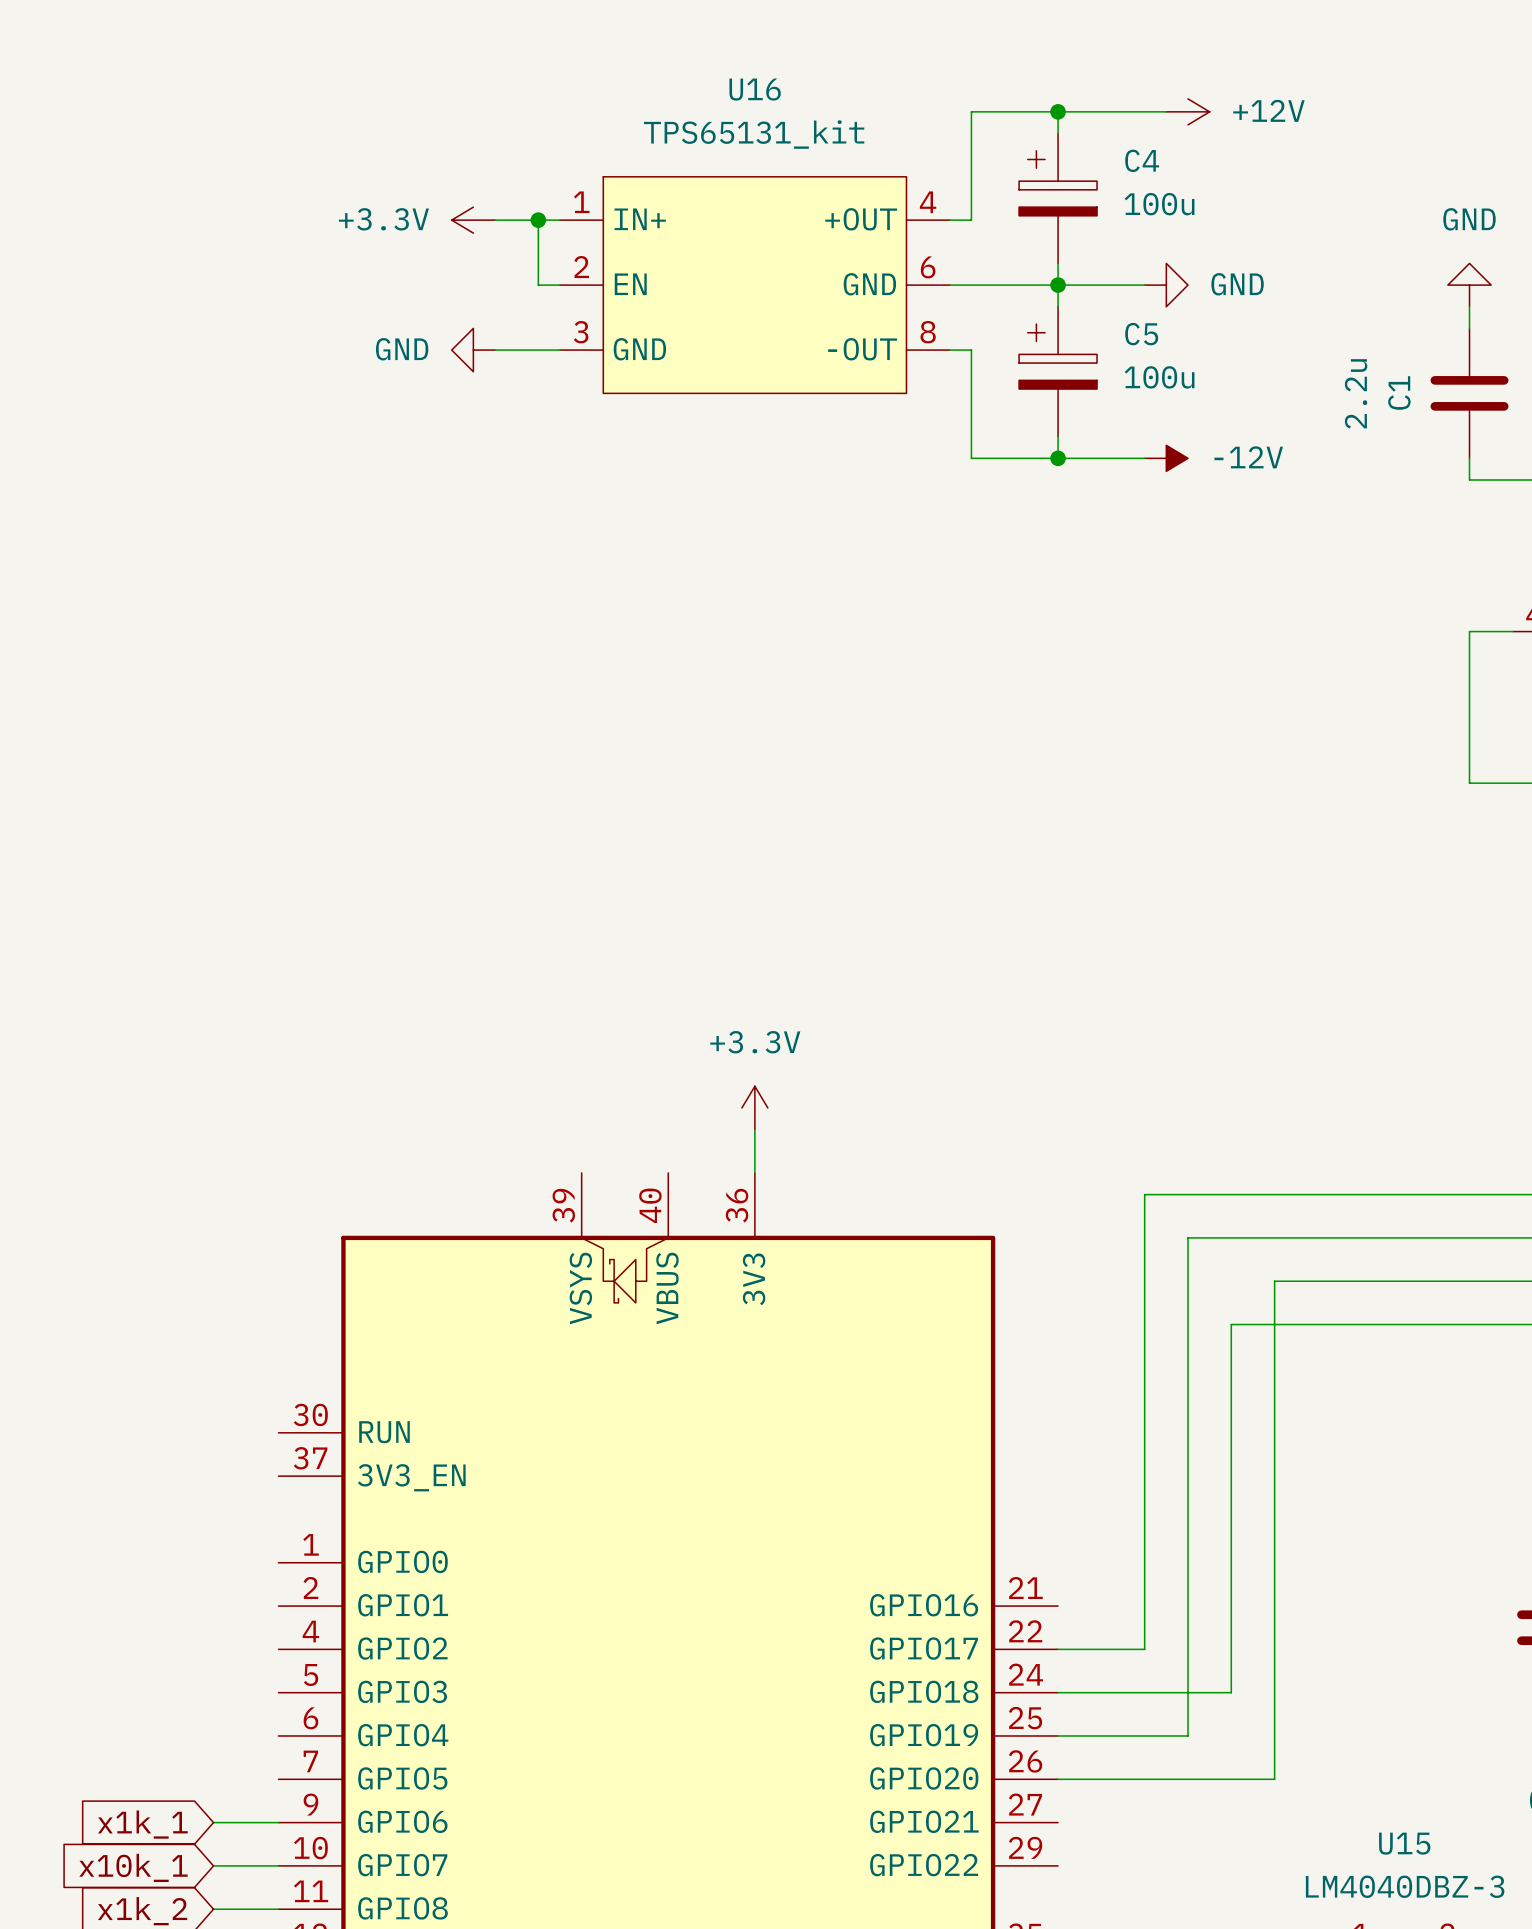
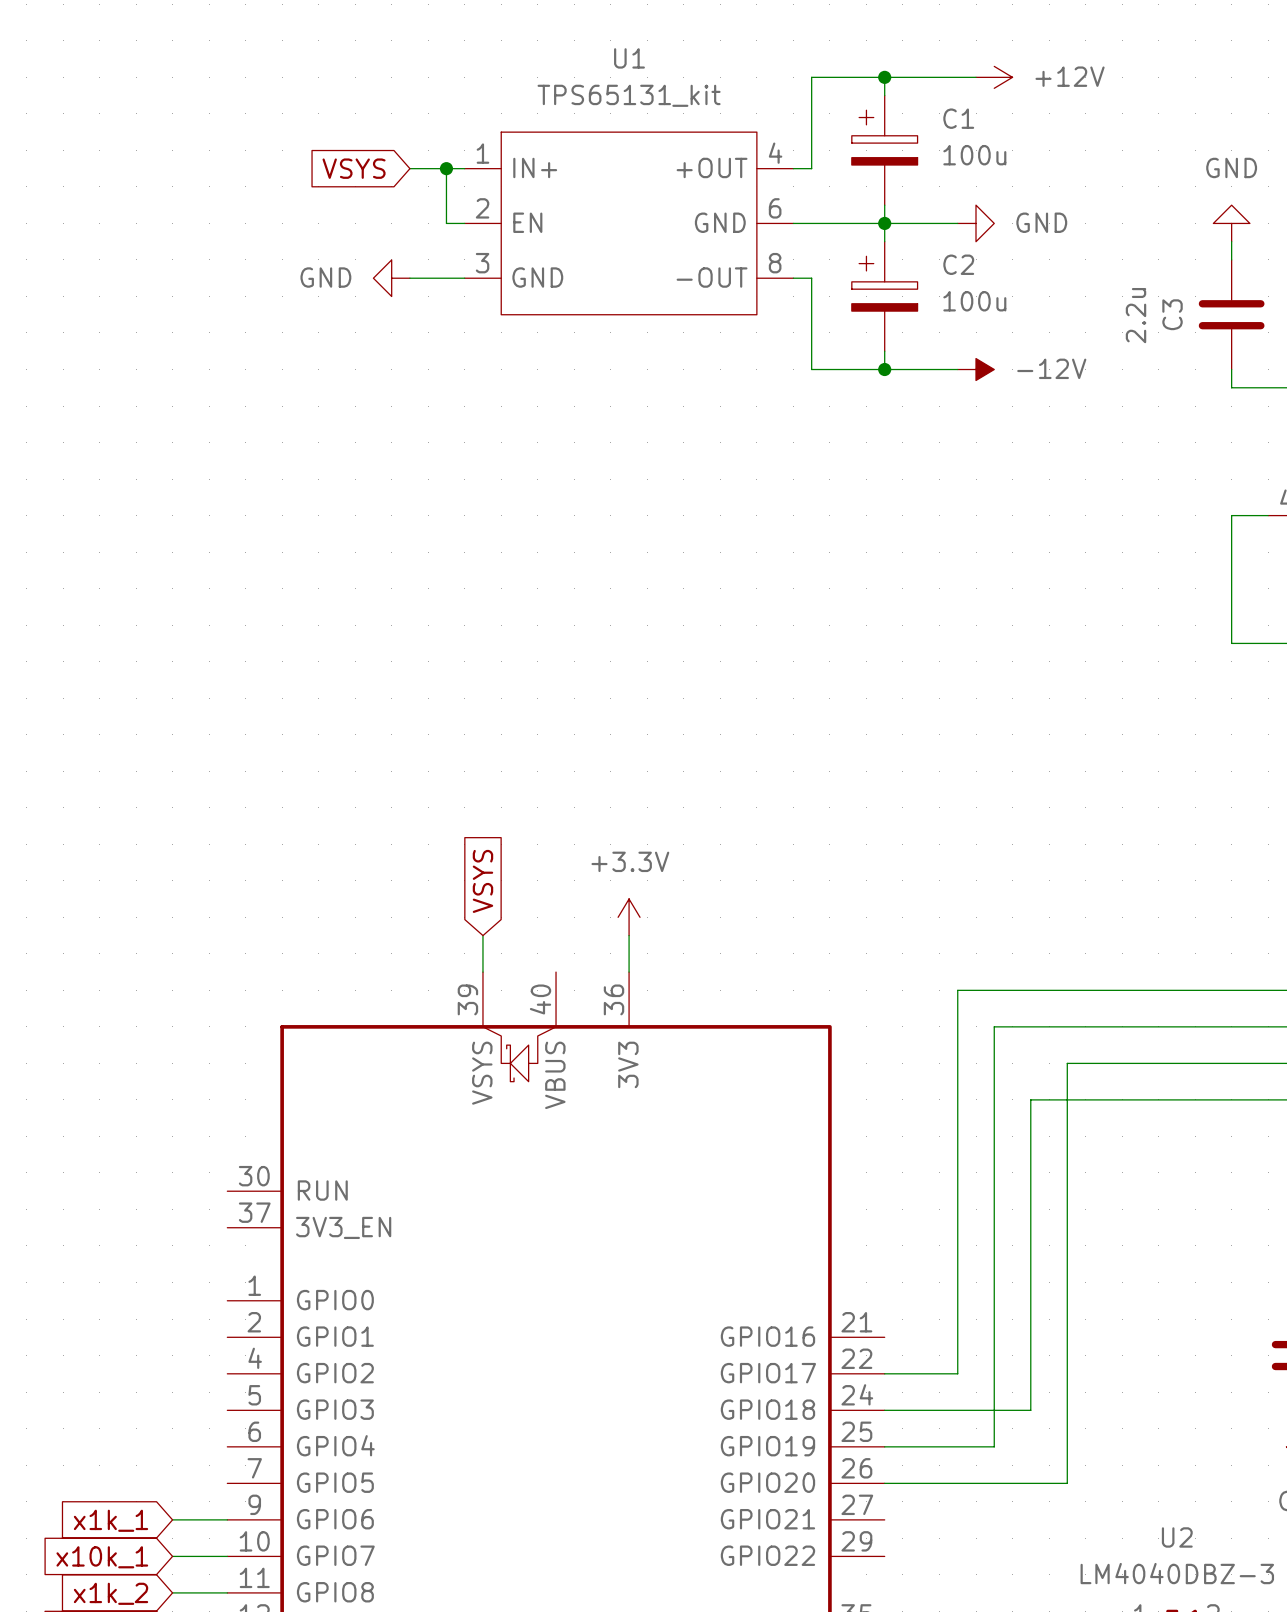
U16 name: U16 (755, 89) -> U1 (629, 58)
C4 name: C4 (1142, 160) -> C1 (958, 118)
global label: none -> VSYS (354, 168)
power symbol: +3.3V (473, 220) -> none
C5 name: C5 (1141, 334) -> C2 (958, 264)
C1 name: C1 (1399, 393) -> C3 (1172, 314)
global label: none -> VSYS (482, 881)
wire: none -> (482, 935) (482, 972)
U15 name: U15 (1404, 1843) -> U2 (1177, 1537)

